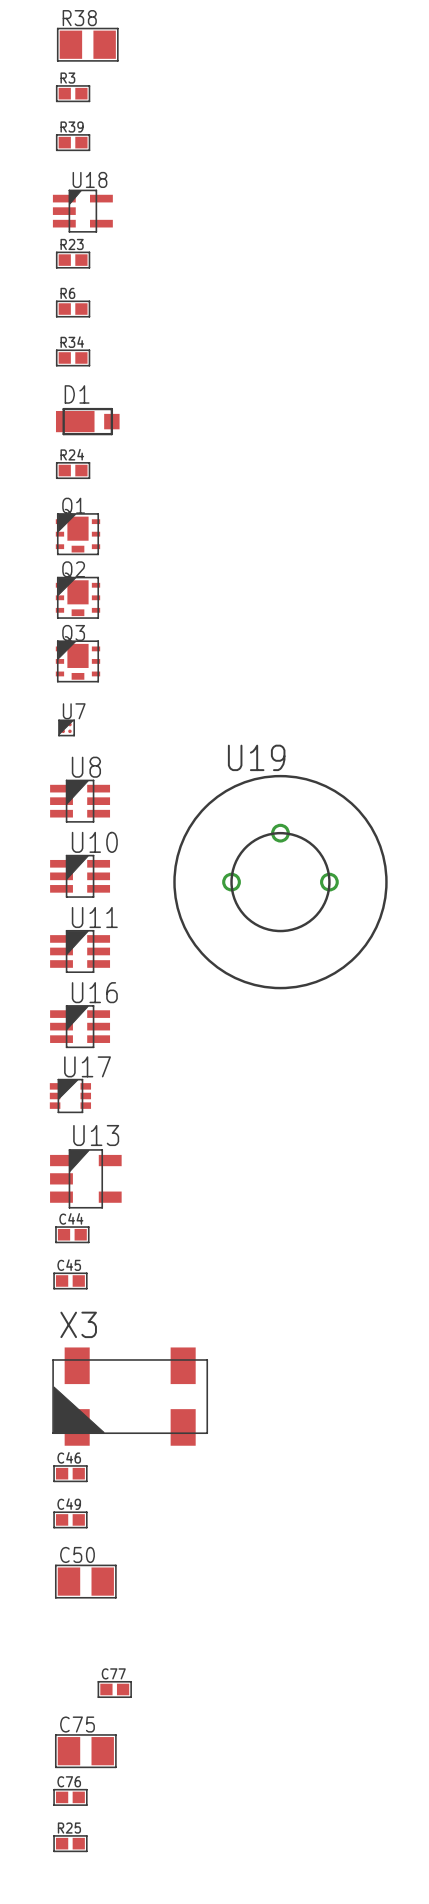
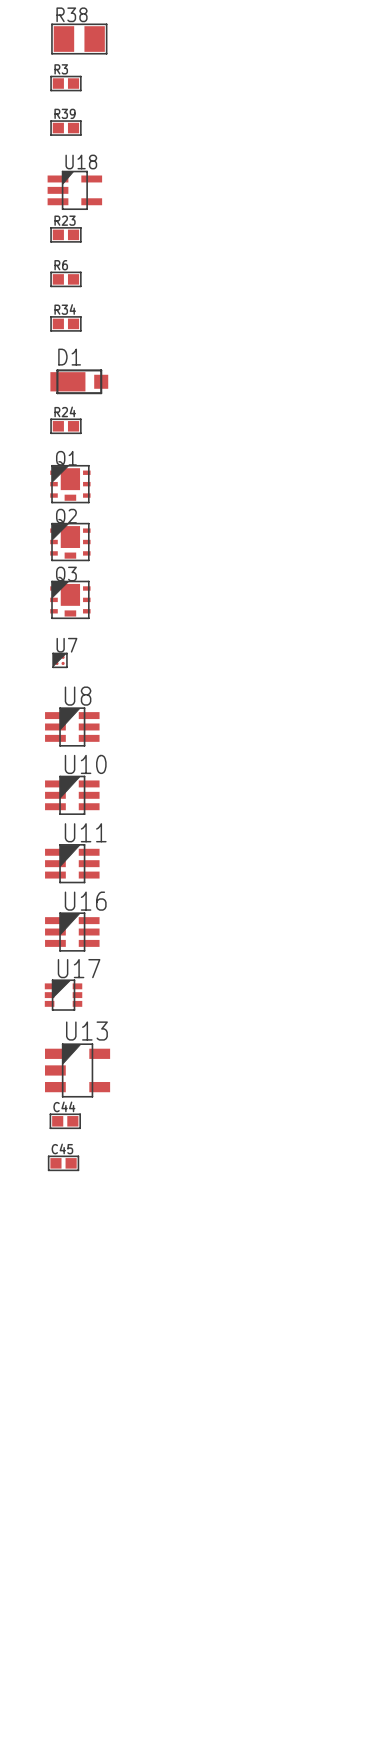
U19: (280, 882) -> none
X3: (130, 1396) -> none
C46: (70, 1473) -> none
C49: (70, 1519) -> none
C50: (85, 1581) -> none
C77: (114, 1689) -> none
C75: (85, 1751) -> none
C76: (70, 1797) -> none
R25: (70, 1843) -> none

